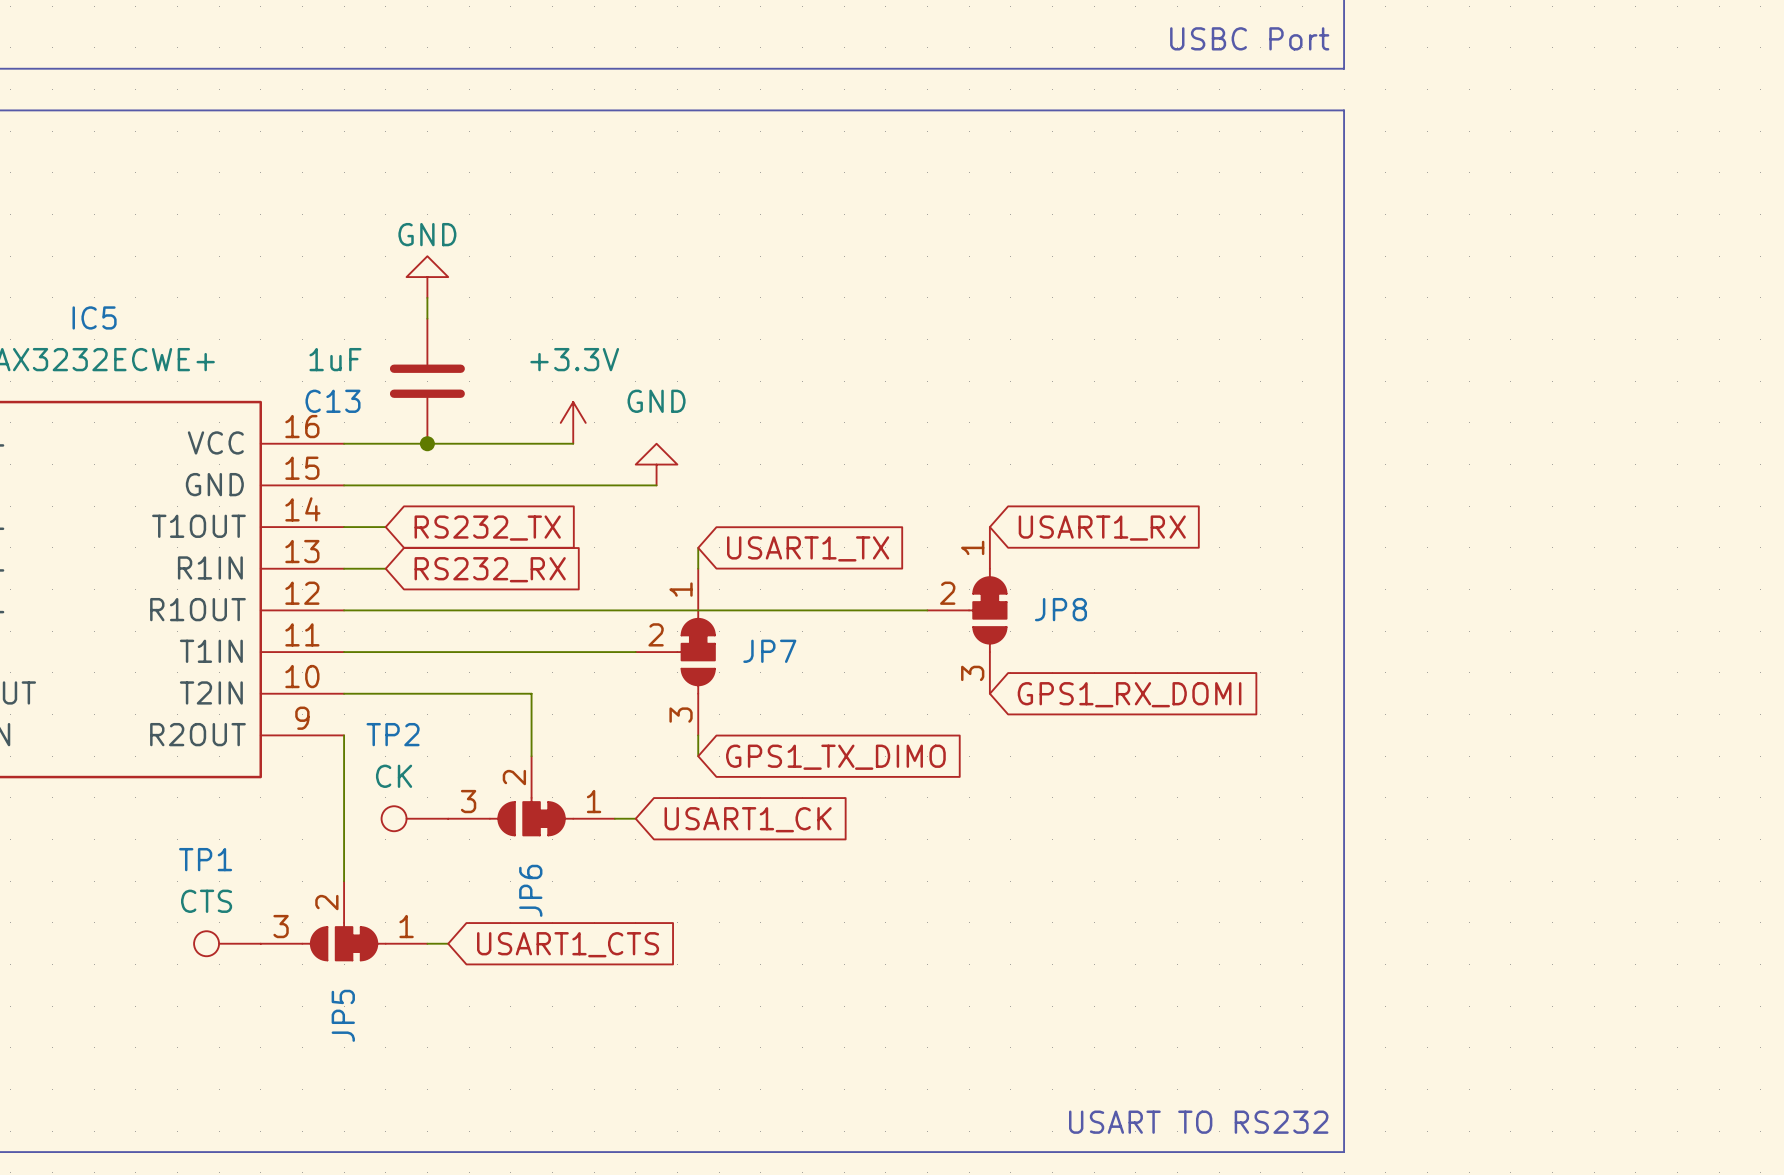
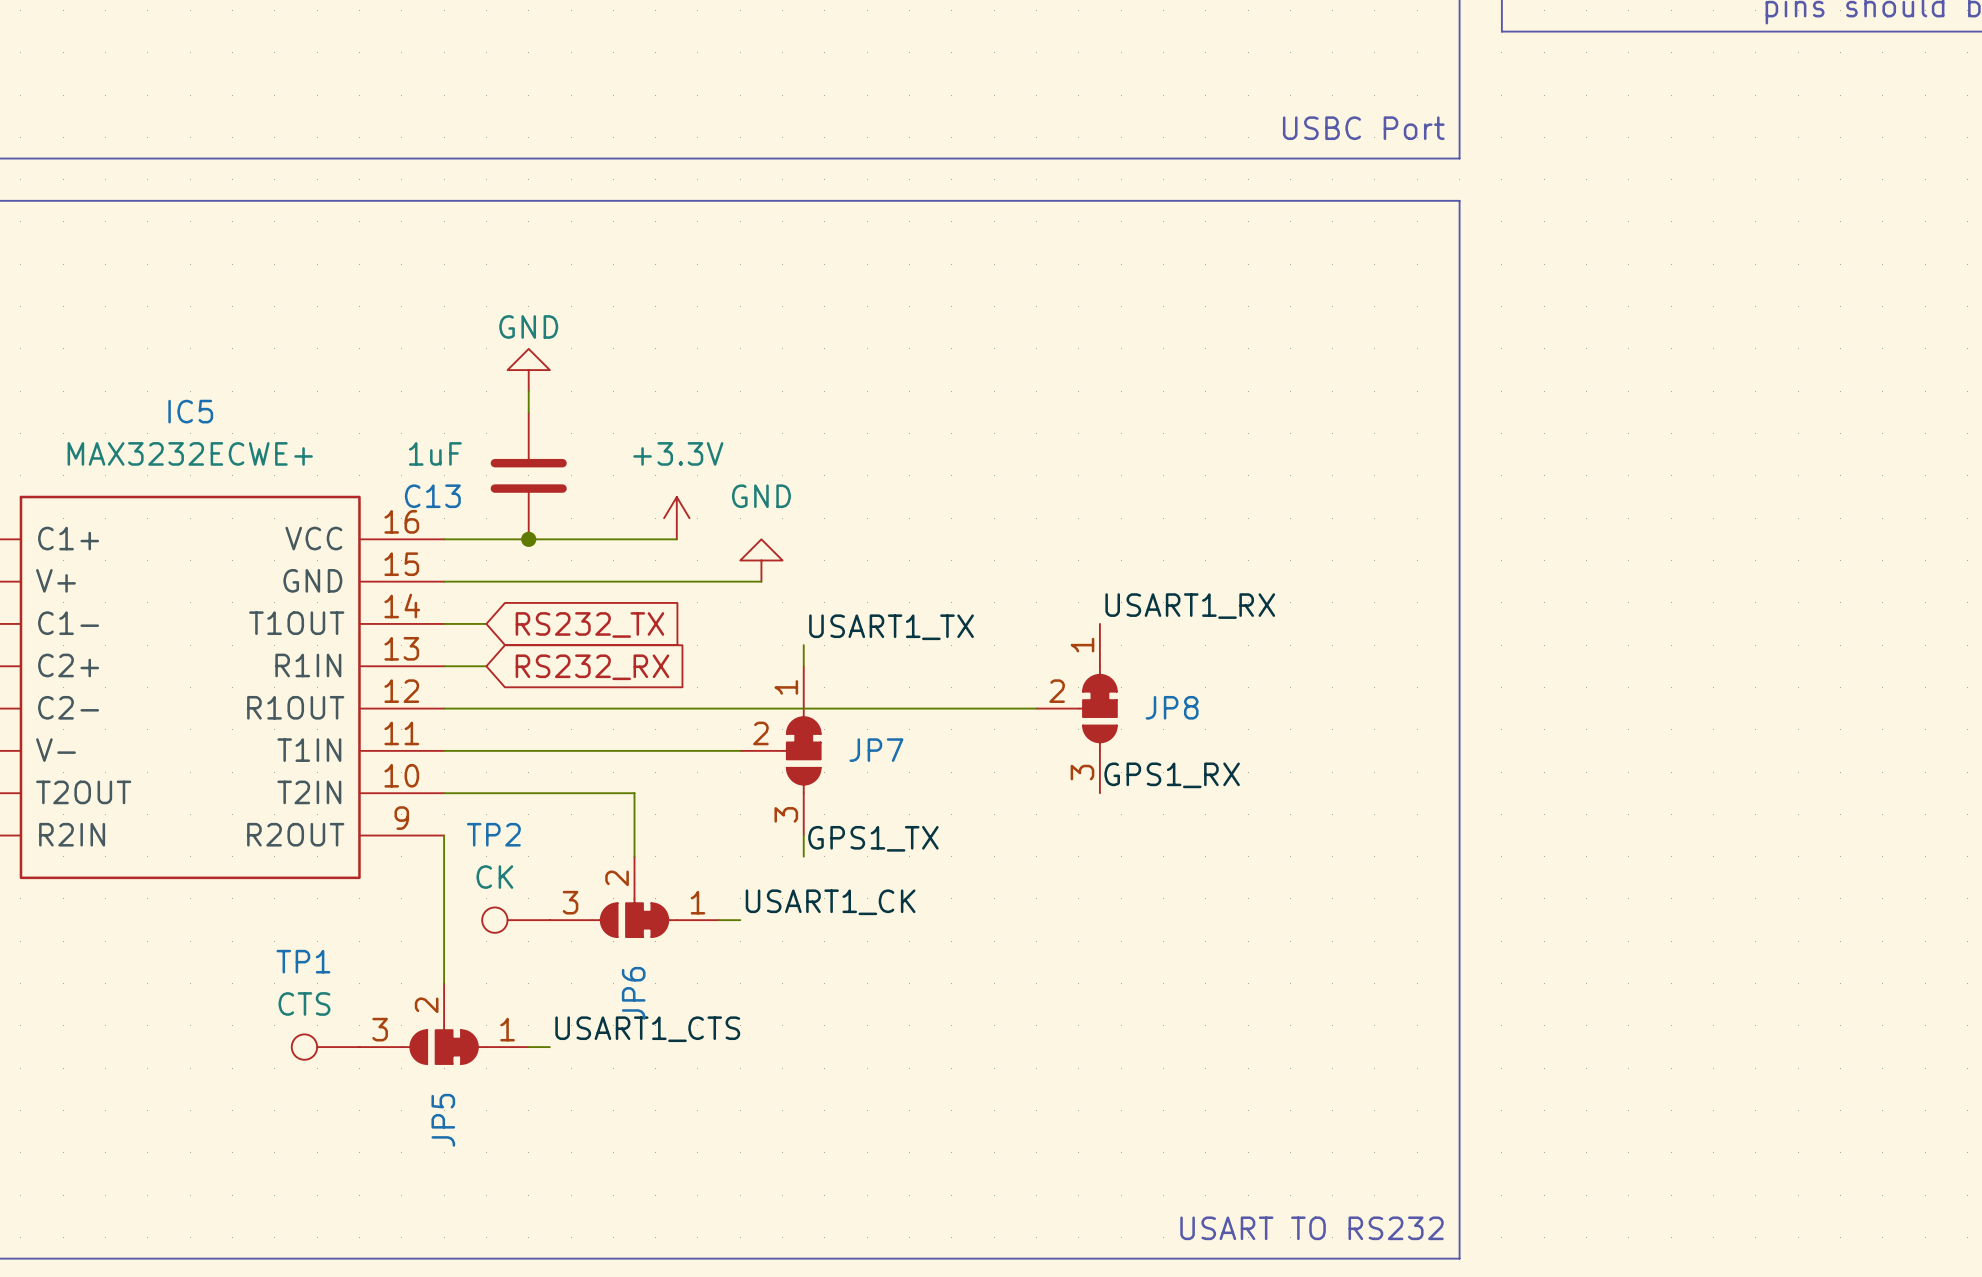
label: none -> USART1_RX (1190, 606)
global label: USART1_RX (1102, 528) -> none
label: none -> USART1_TX (891, 627)
global label: USART1_TX (808, 548) -> none
label: none -> GPS1_RX (1172, 775)
global label: GPS1_RX_DOMI (1129, 694) -> none
label: none -> GPS1_TX (873, 838)
global label: GPS1_TX_DIMO (835, 757) -> none
label: none -> USART1_CK (830, 902)
global label: USART1_CK (748, 819) -> none
label: none -> USART1_CTS (647, 1029)
global label: USART1_CTS (568, 944) -> none

